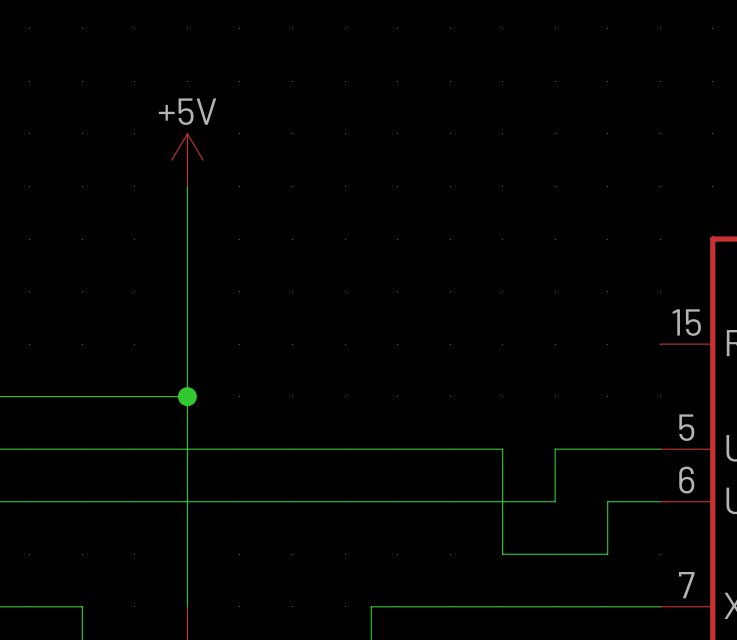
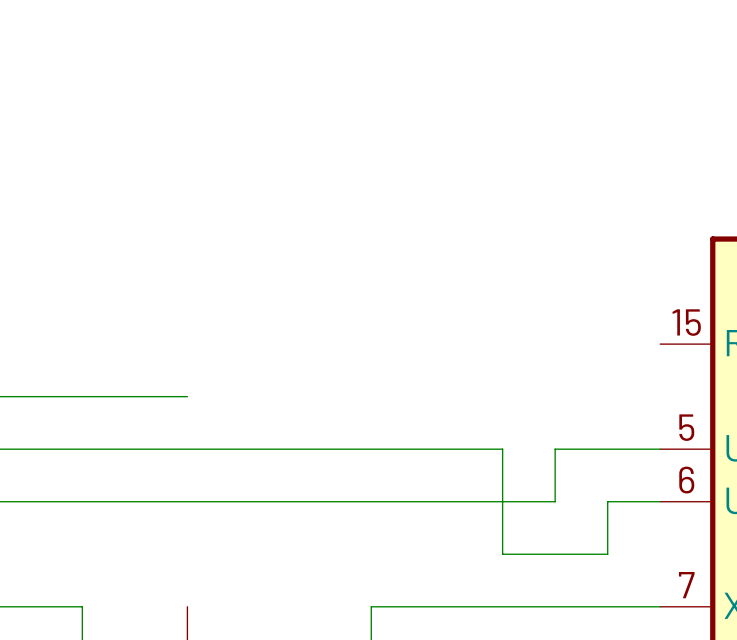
power symbol: +5V (187, 160) -> none
wire: (187, 186) (187, 606) -> none
junction: (187, 396) -> none

